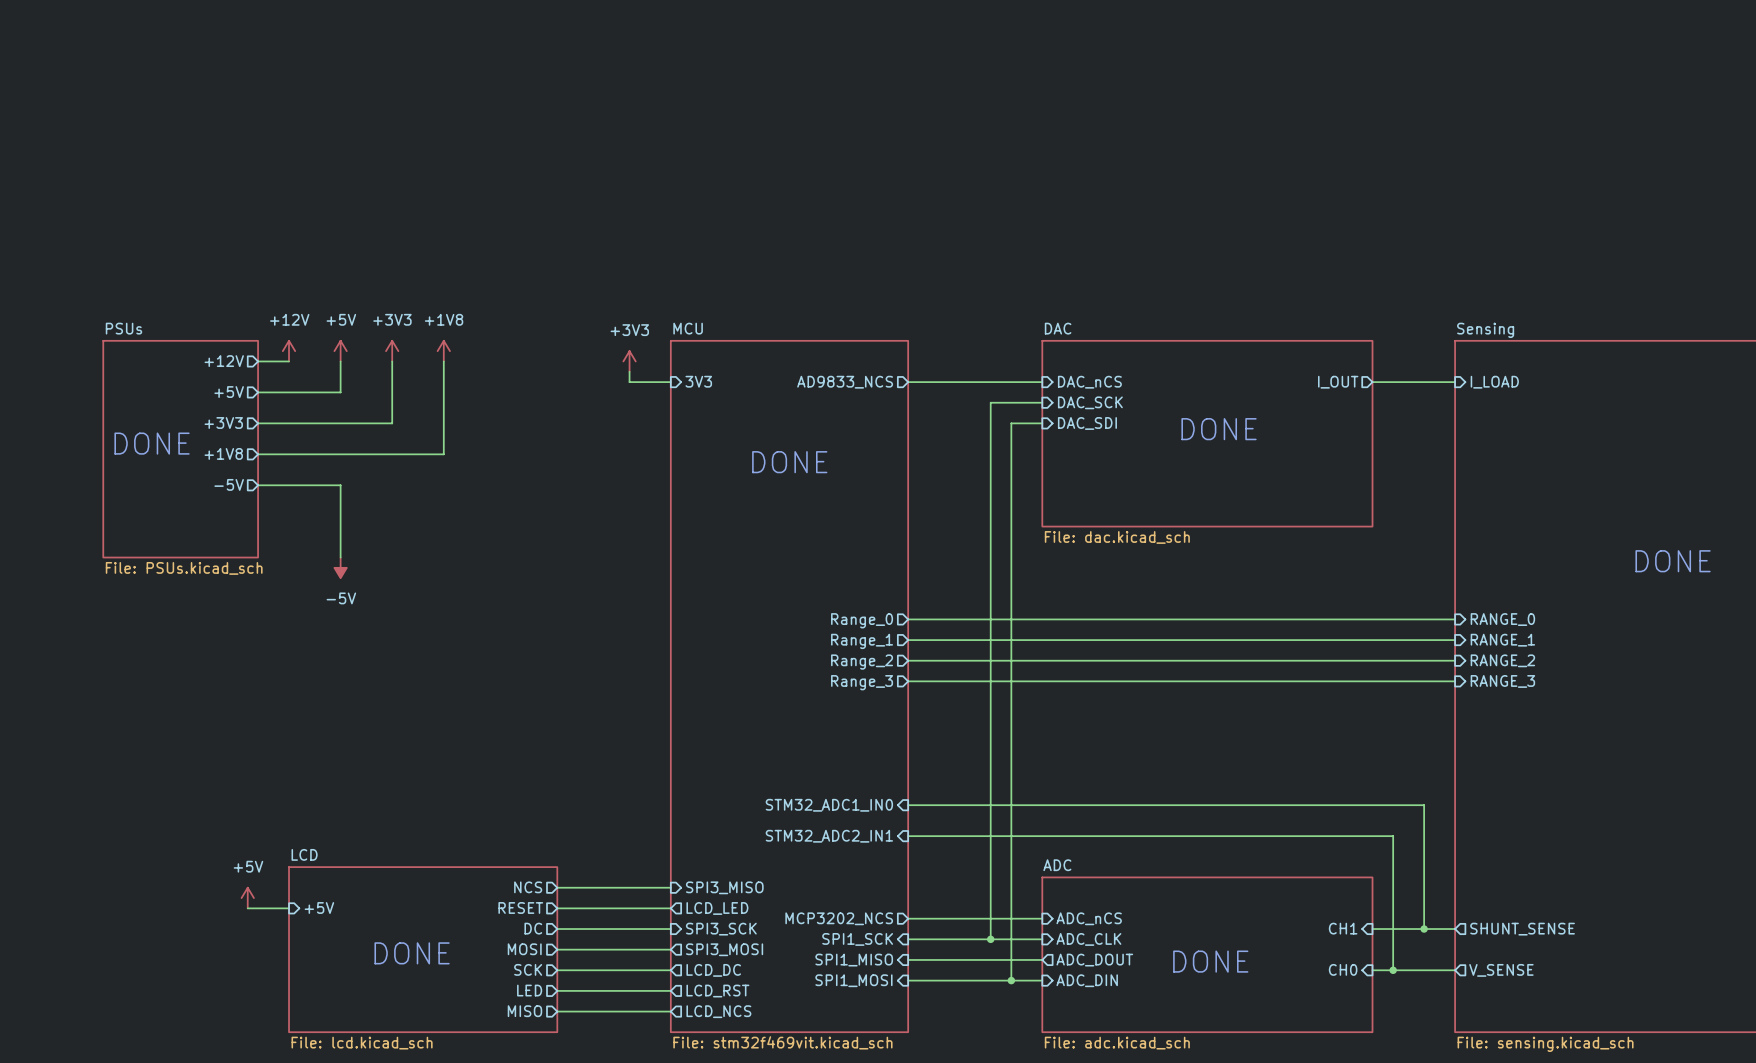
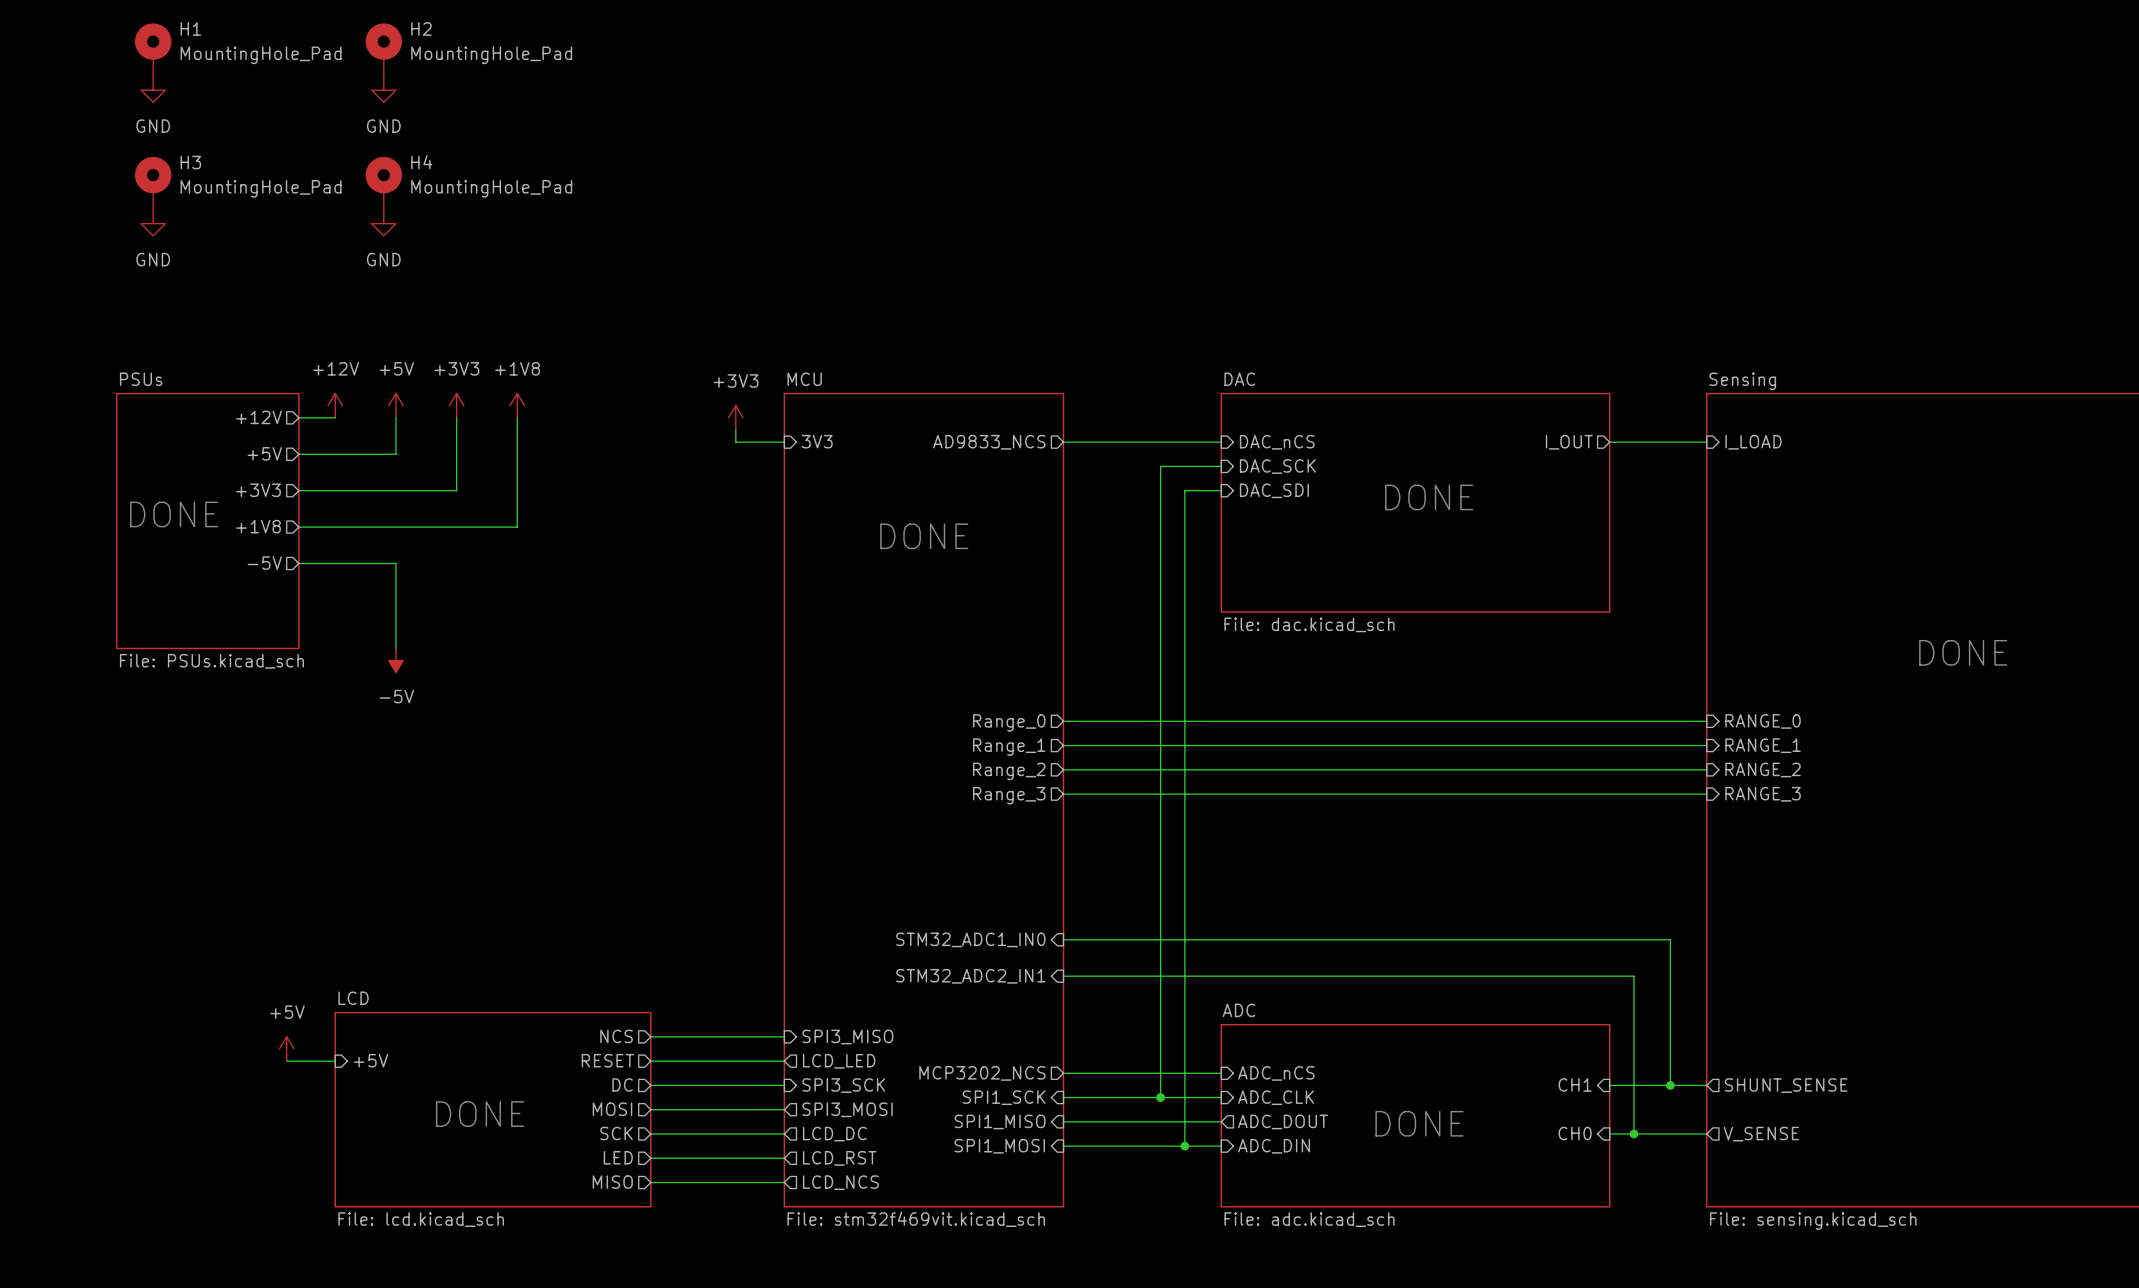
H1: none -> MountingHole_Pad (153, 50)
H2: none -> MountingHole_Pad (383, 50)
power symbol: none -> GND (153, 90)
power symbol: none -> GND (383, 90)
H3: none -> MountingHole_Pad (153, 184)
H4: none -> MountingHole_Pad (383, 184)
power symbol: none -> GND (153, 223)
power symbol: none -> GND (383, 223)

